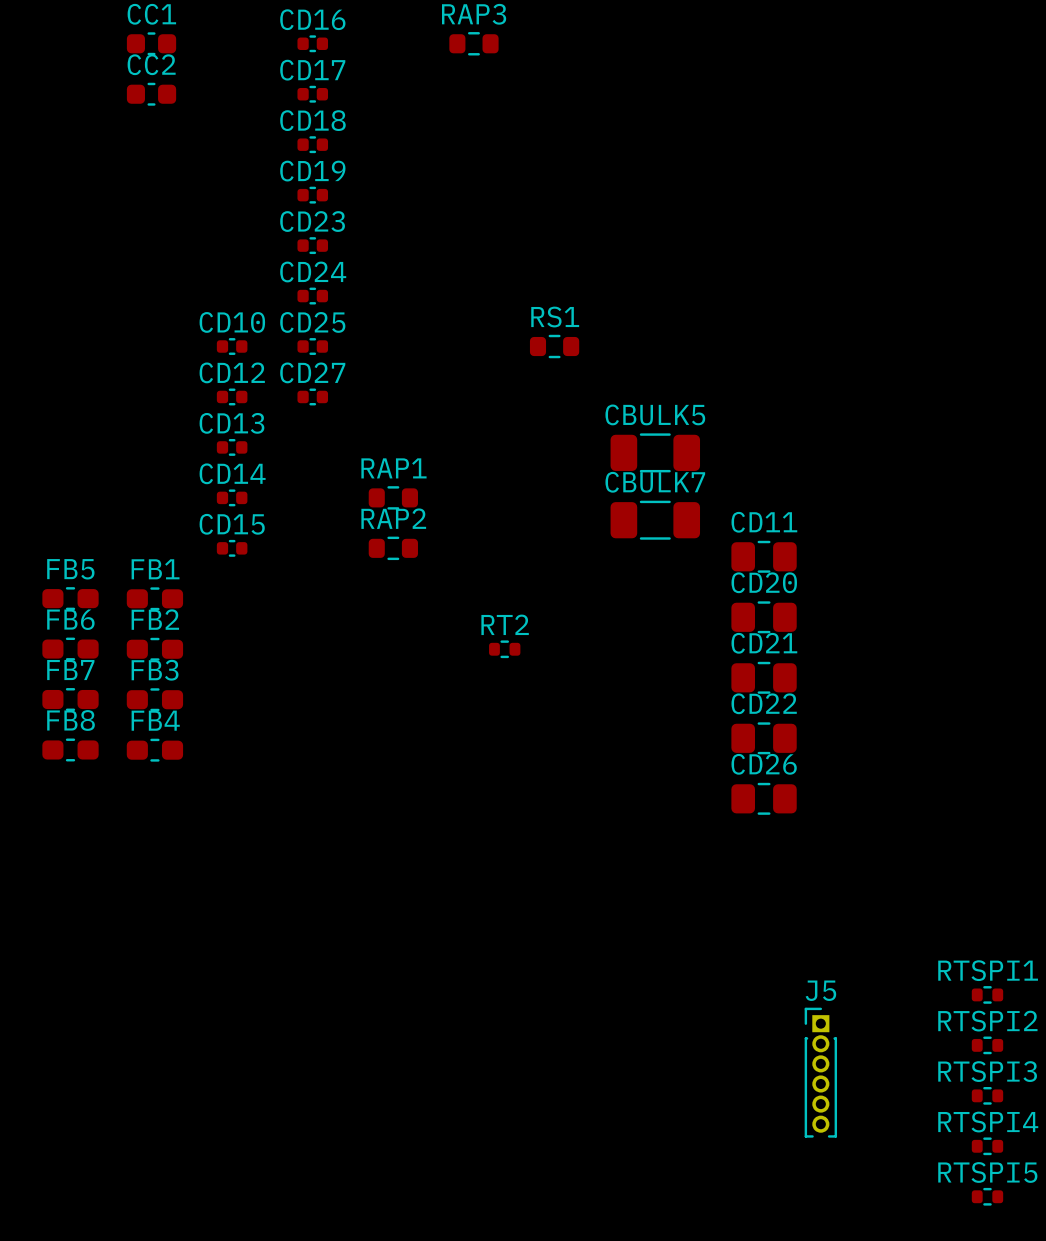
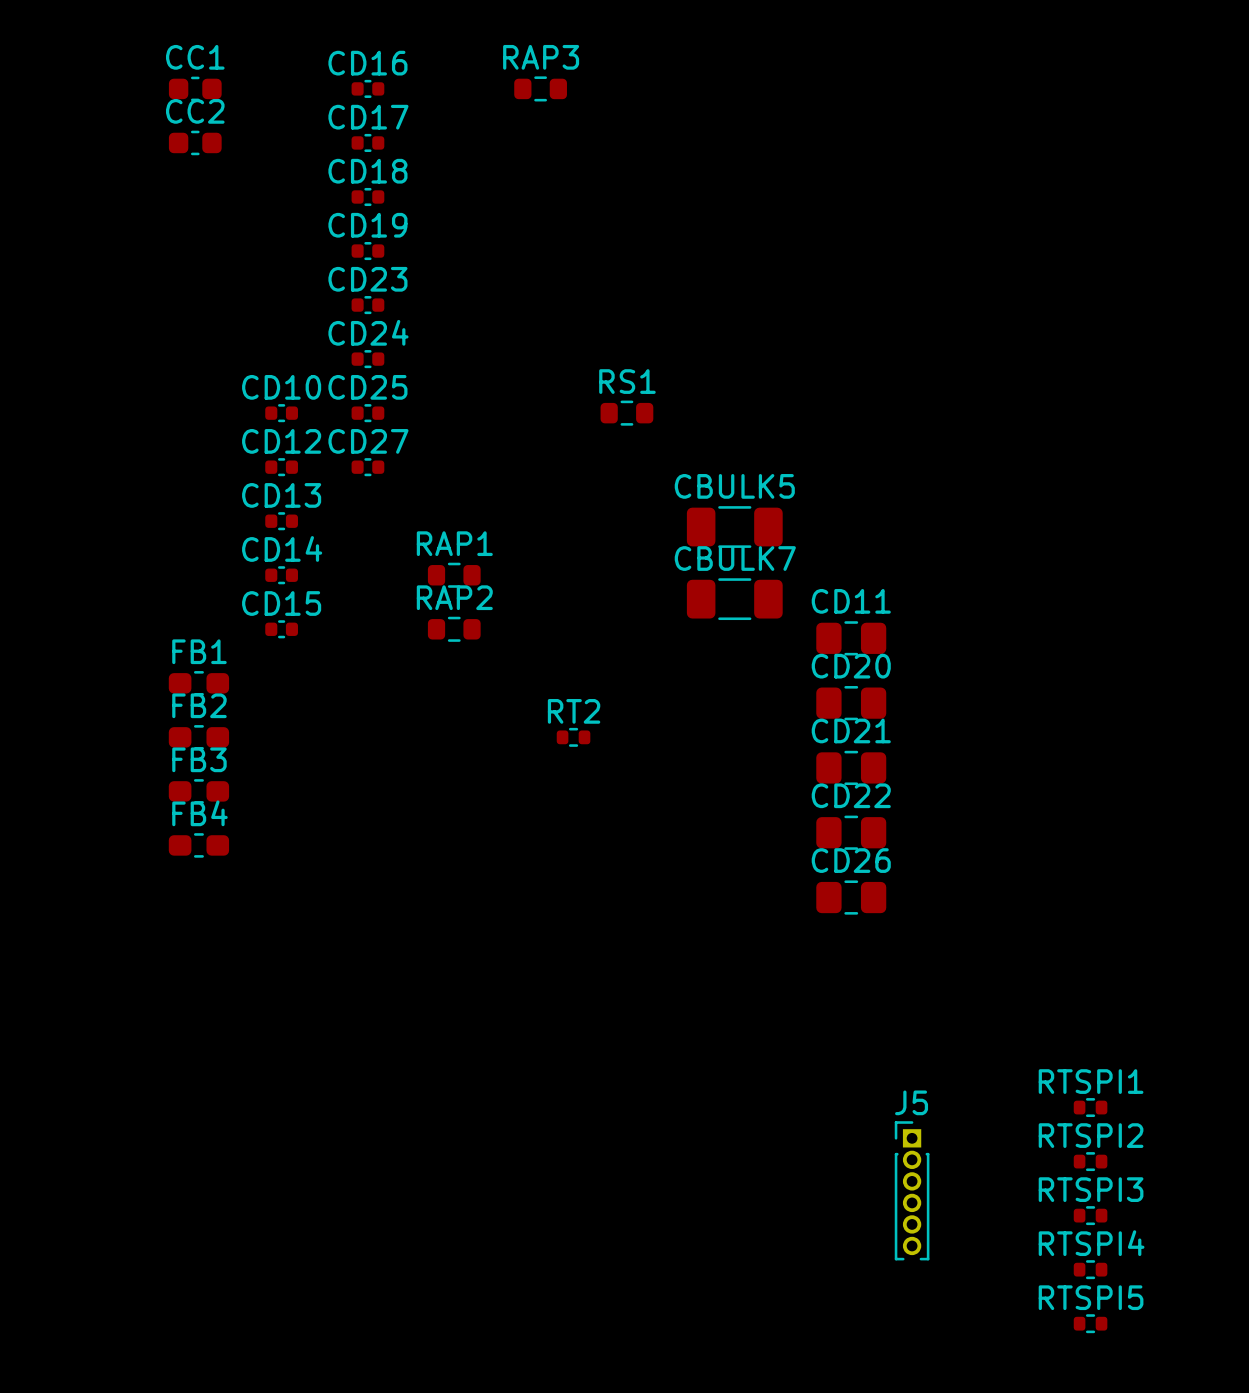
FB5: (70, 598) -> none
FB6: (70, 649) -> none
FB7: (70, 699) -> none
FB8: (70, 749) -> none

